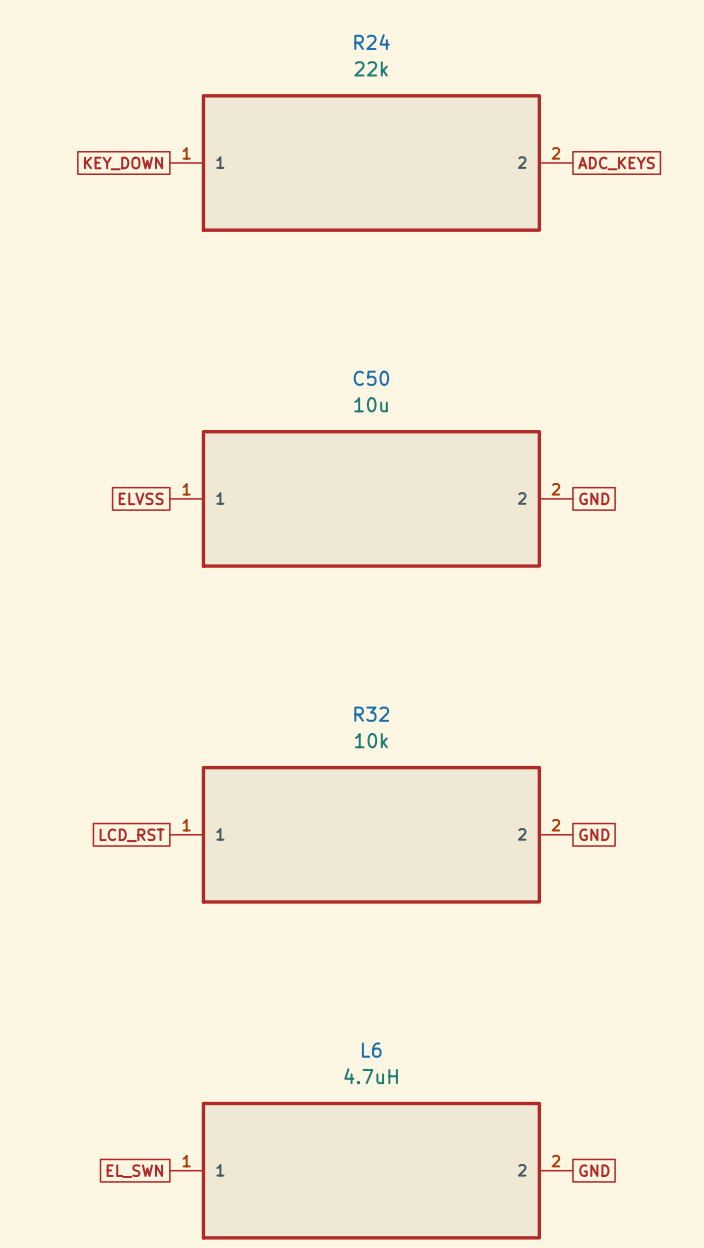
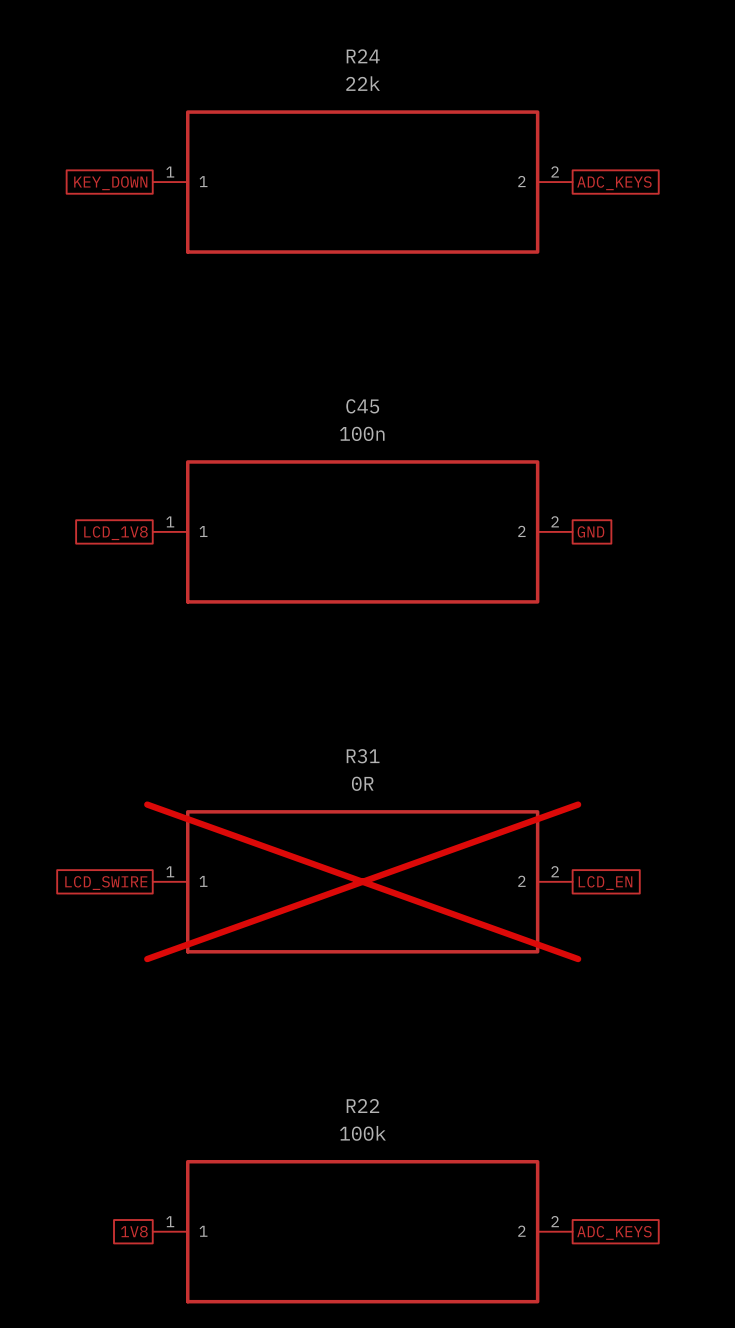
C50 name: C50 (371, 378) -> C45 (362, 406)
C50 value: 10u (371, 404) -> 100n (362, 433)
global label: ELVSS (141, 498) -> LCD_1V8 (115, 533)
R32 name: R32 (371, 714) -> R31 (363, 756)
R32 value: 10k (371, 740) -> 0R (362, 783)
R32 do-not-place cross: none -> (362, 881)
global label: GND (594, 834) -> LCD_EN (605, 883)
global label: LCD_RST (132, 835) -> LCD_SWIRE (106, 883)
L6 name: L6 (371, 1050) -> R22 (362, 1106)
L6 value: 4.7uH (371, 1076) -> 100k (362, 1133)
global label: GND (594, 1170) -> ADC_KEYS (614, 1232)
global label: EL_SWN (134, 1171) -> 1V8 (134, 1231)

